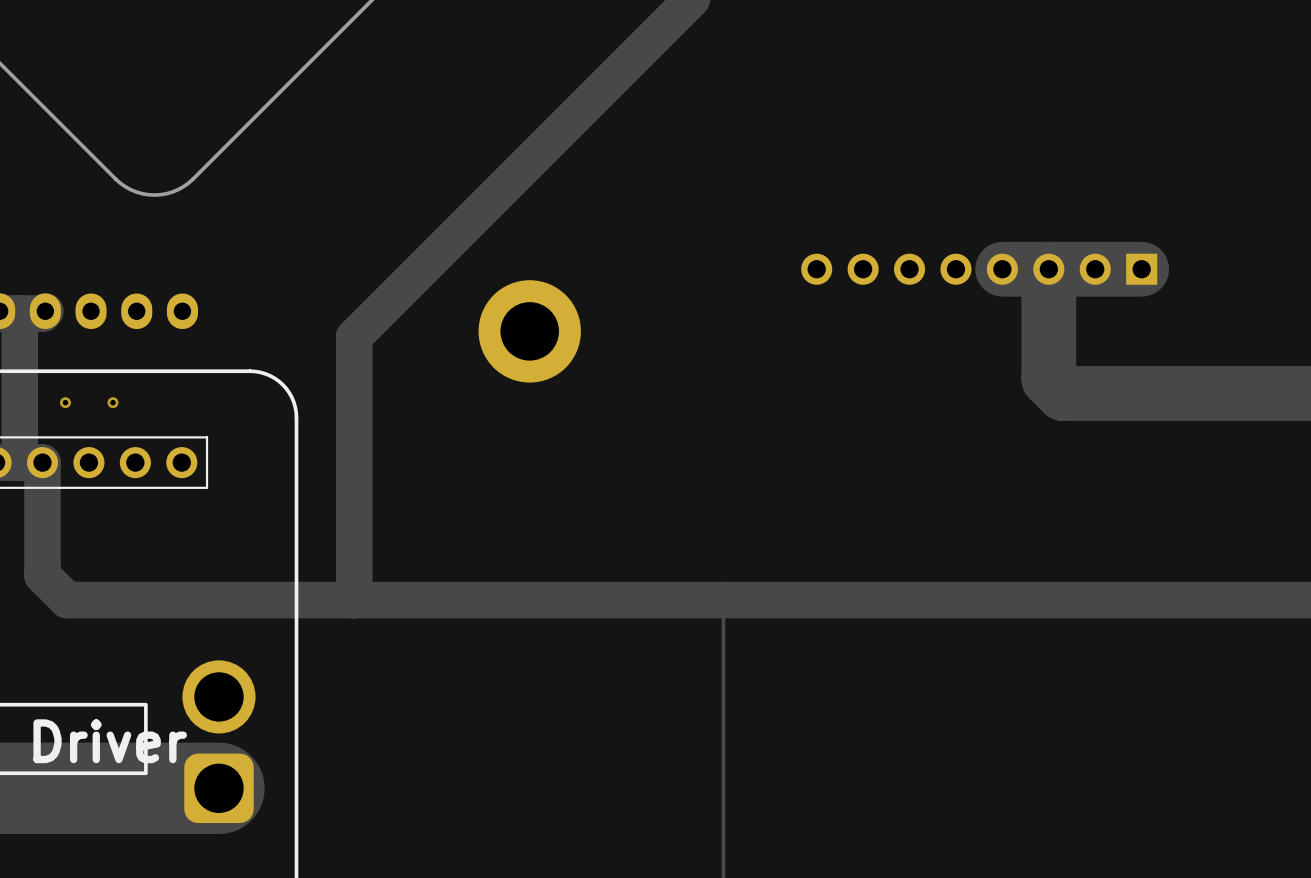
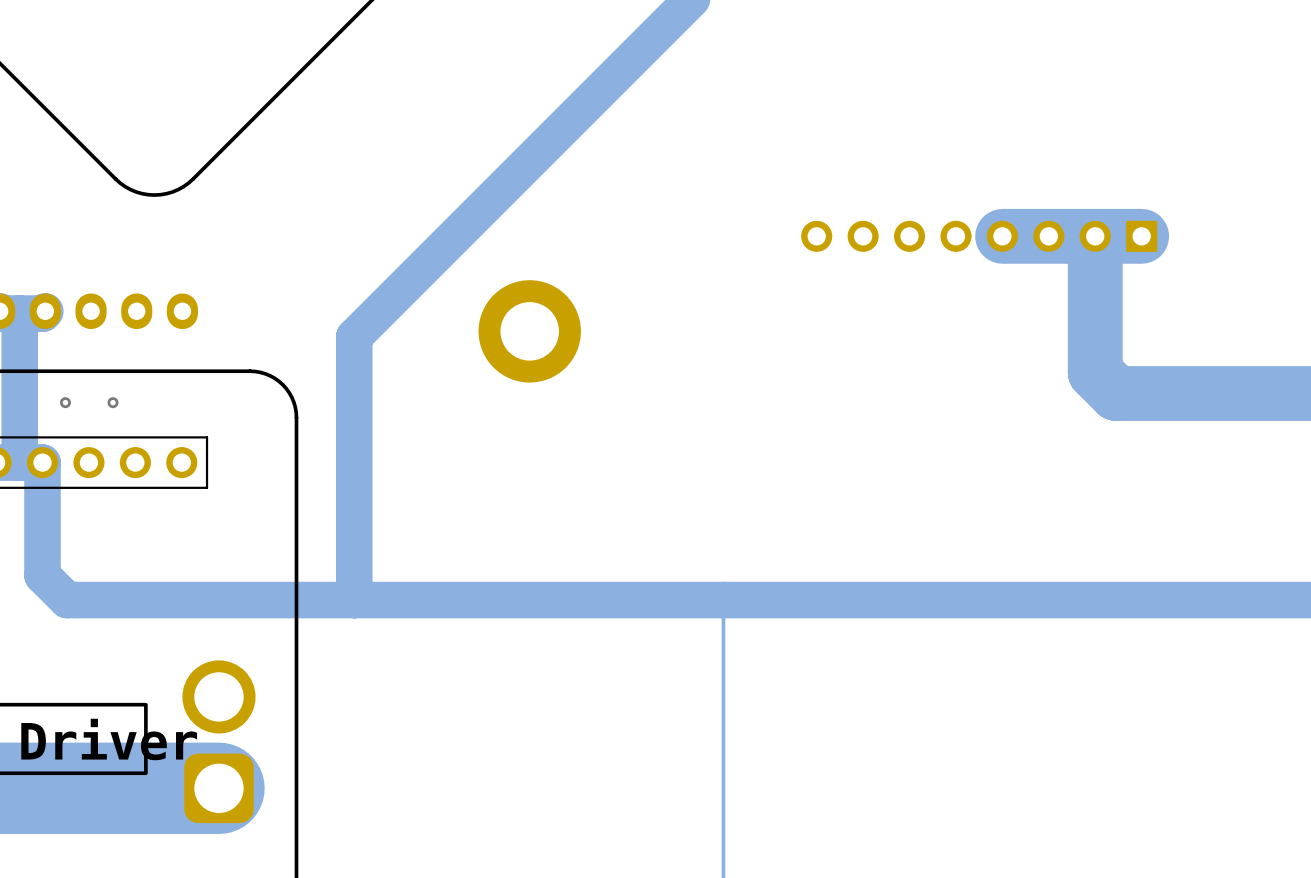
part position: (979, 269) -> (979, 236)
track: (1048, 269) (1048, 378) (1063, 393) (1116, 393) -> (1095, 236) (1095, 372) (1116, 393)
track: (1141, 269) (1002, 269) -> (1141, 236) (1002, 236)

